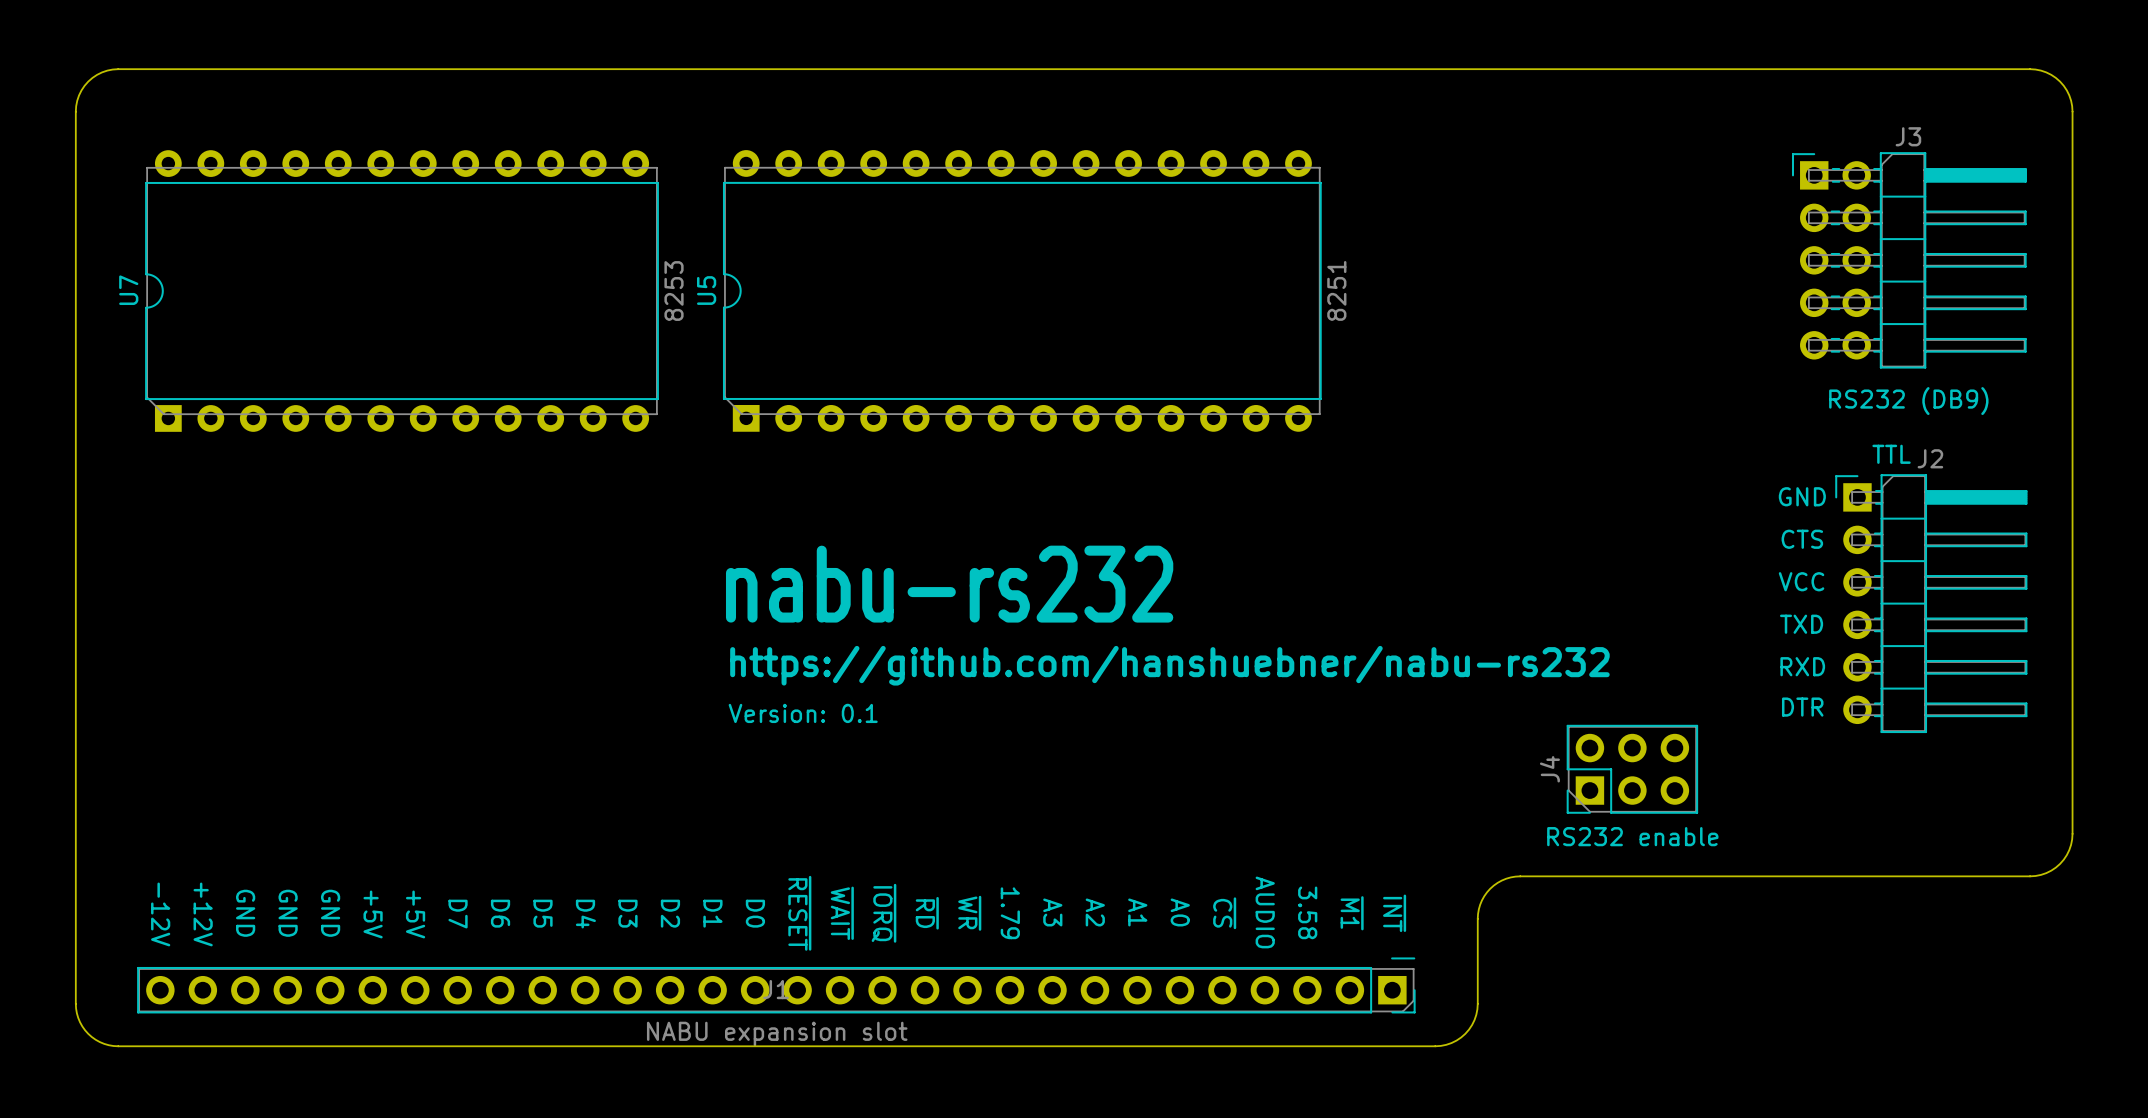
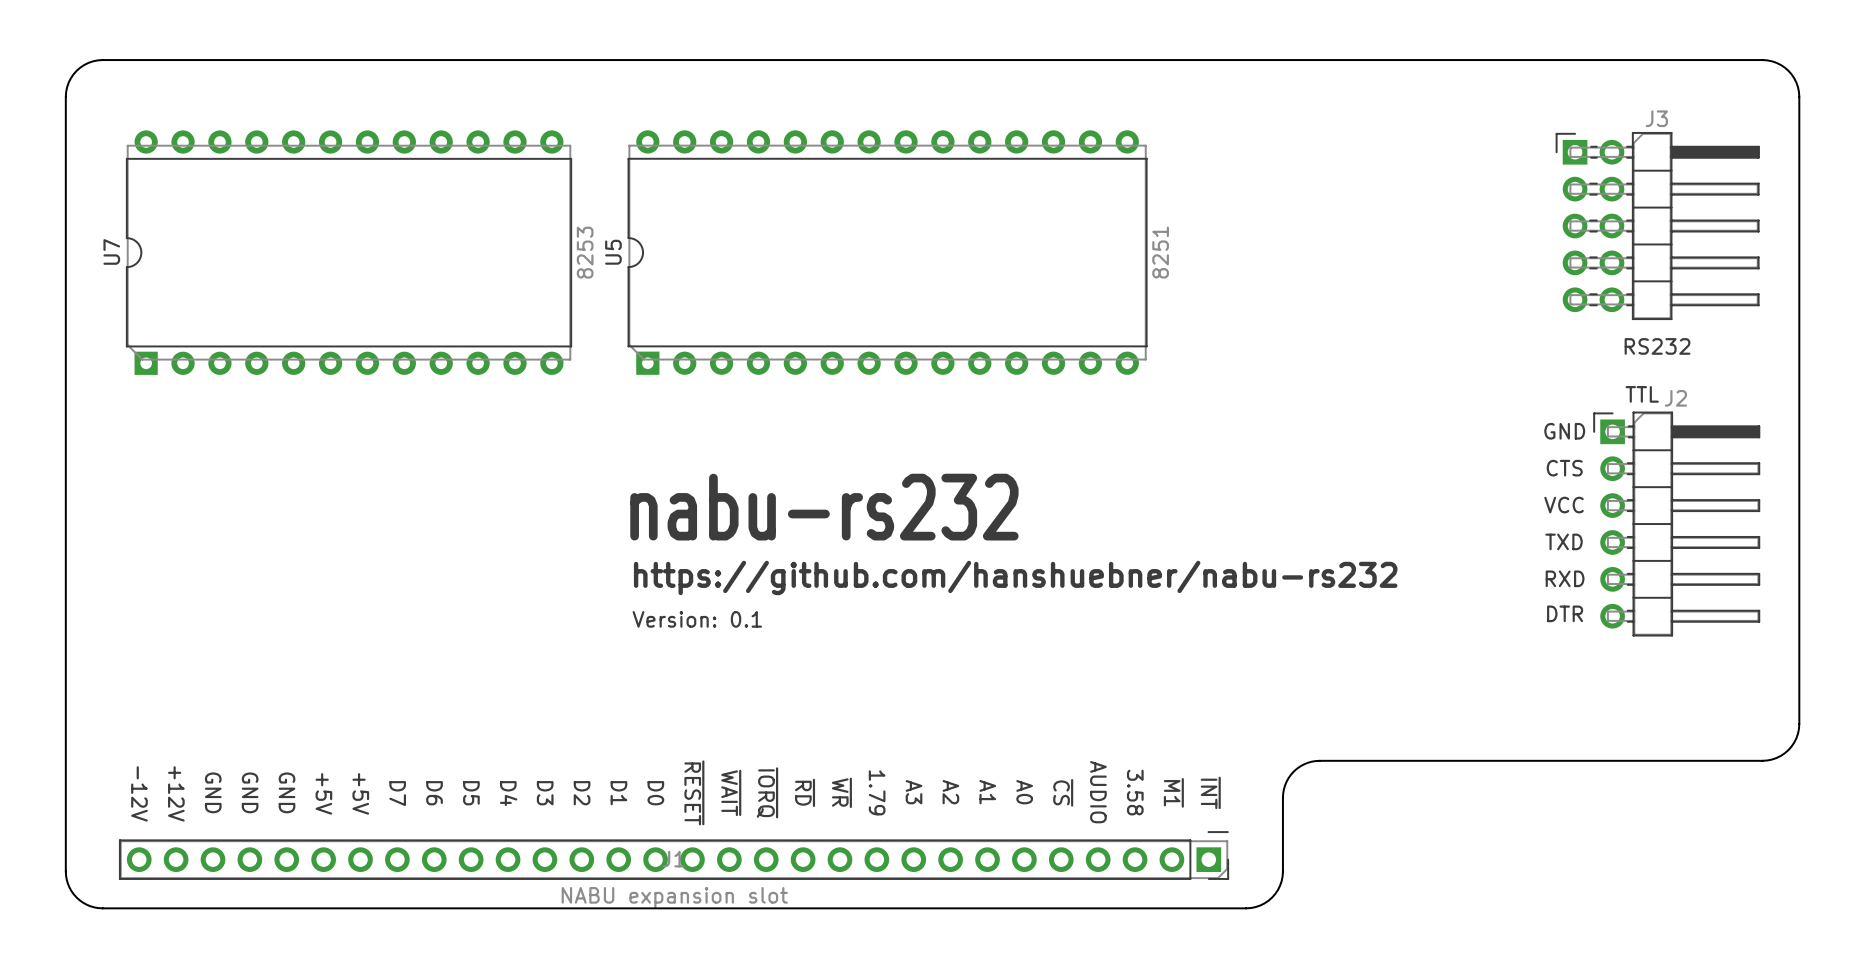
J3 value: RS232 (DB9) (1908, 401) -> RS232 (1657, 346)
J4: RS232 enable (1632, 769) -> none

